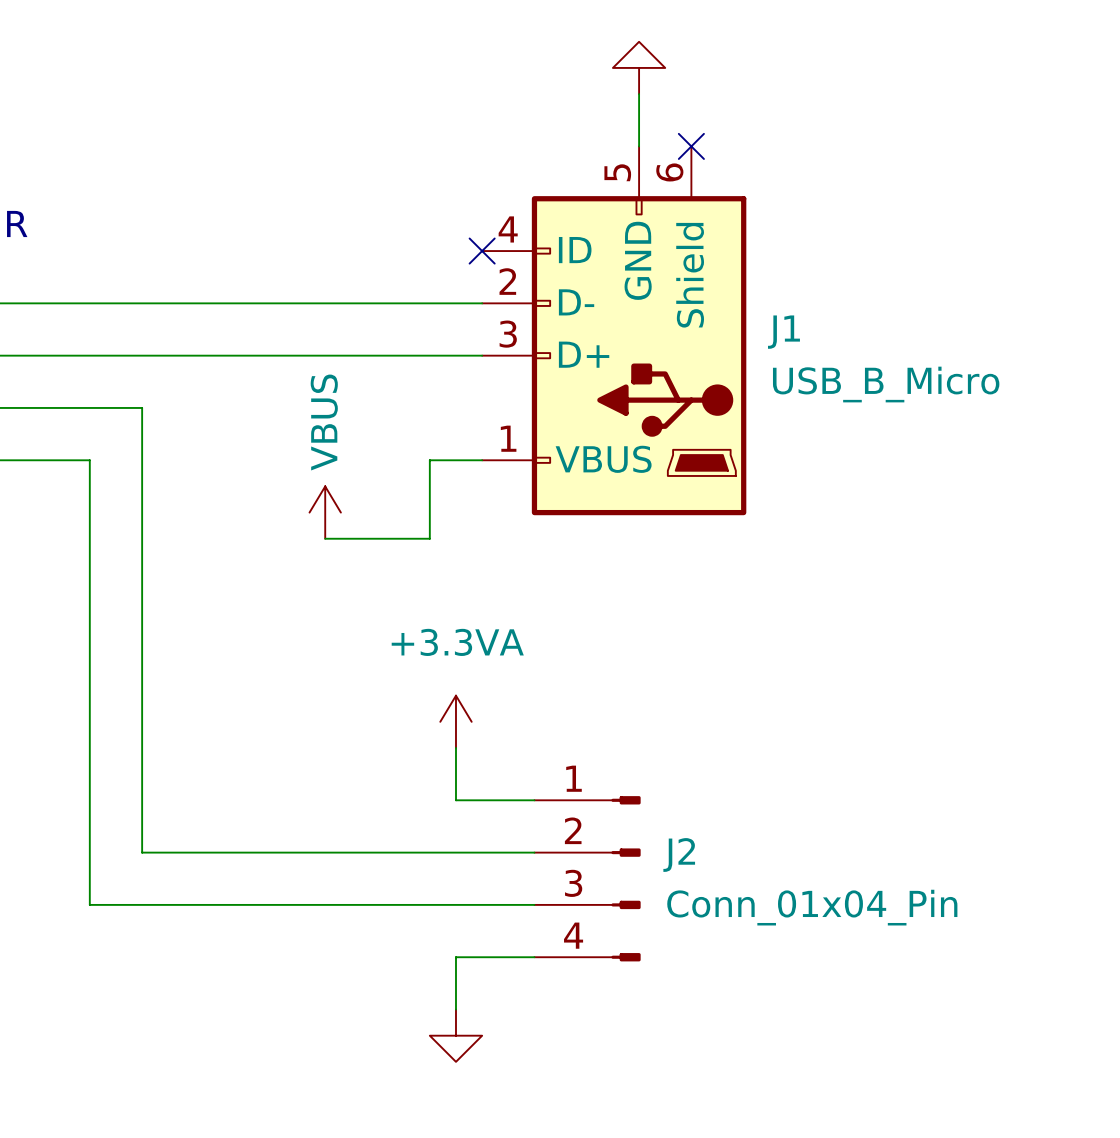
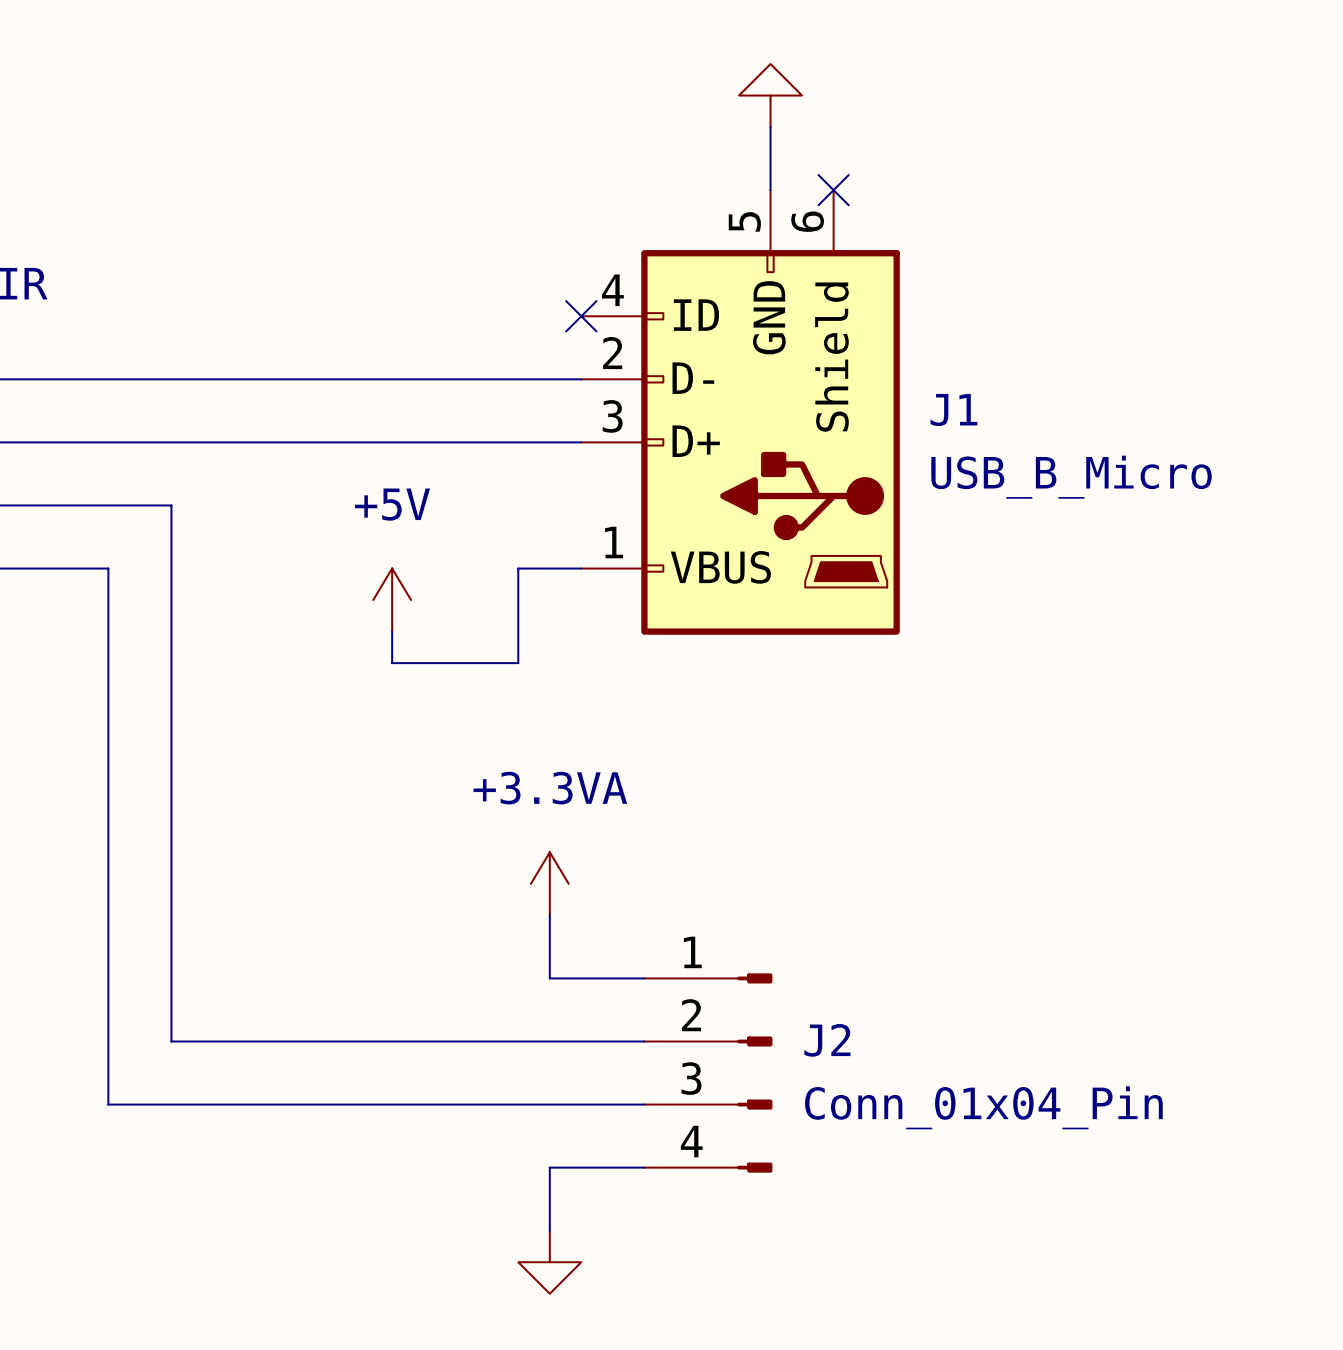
power symbol: none -> +5V (392, 600)
power symbol: VBUS (325, 512) -> none

